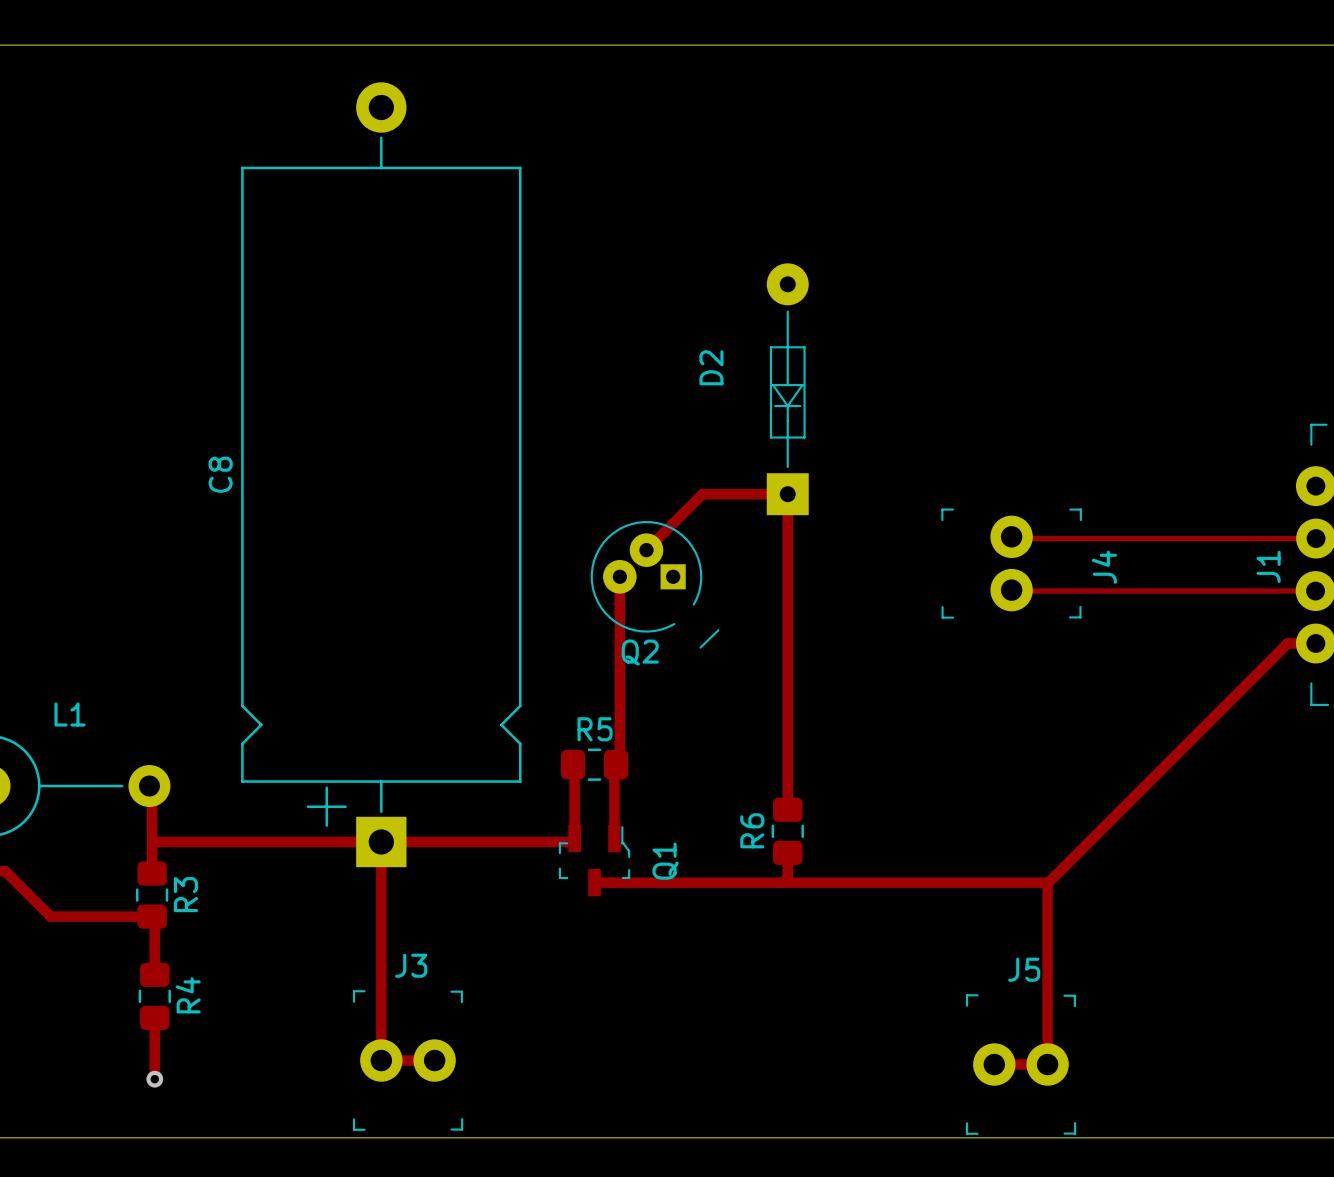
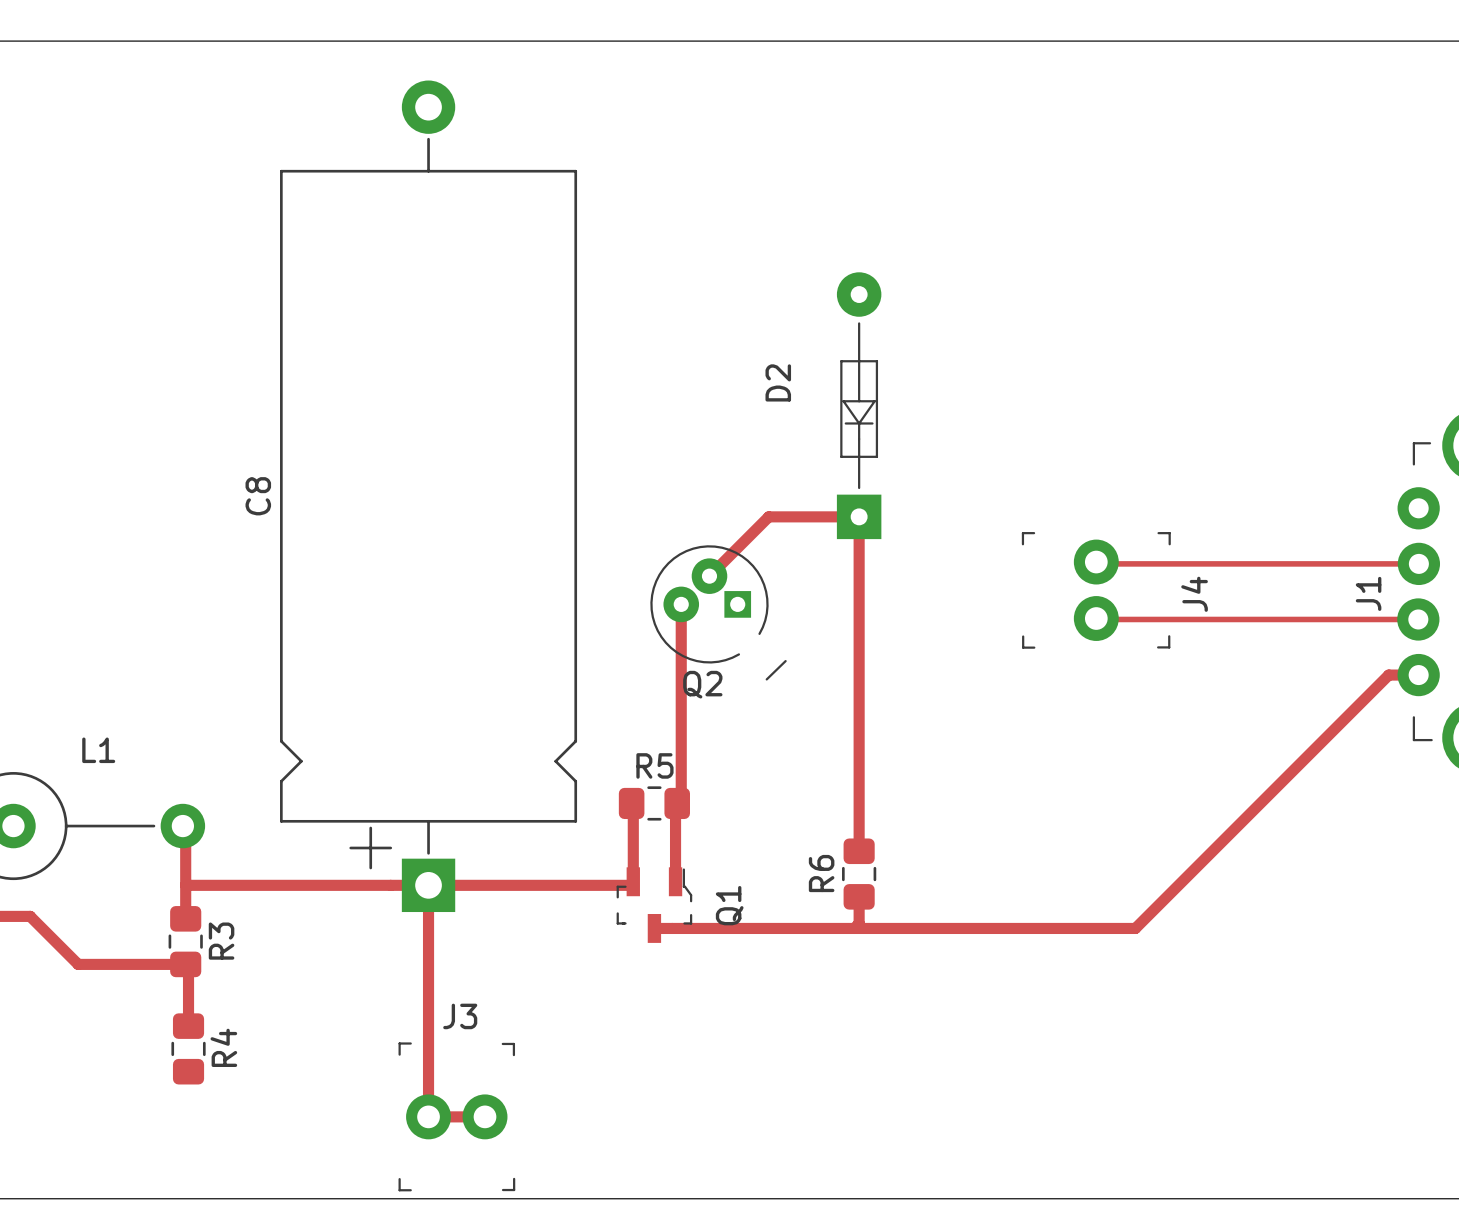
track: (1048, 882) (1047, 1064) (994, 1064) -> none
track: (154, 1017) (154, 1079) -> none
J5: (1021, 1064) -> none
via: (154, 1079) -> none

